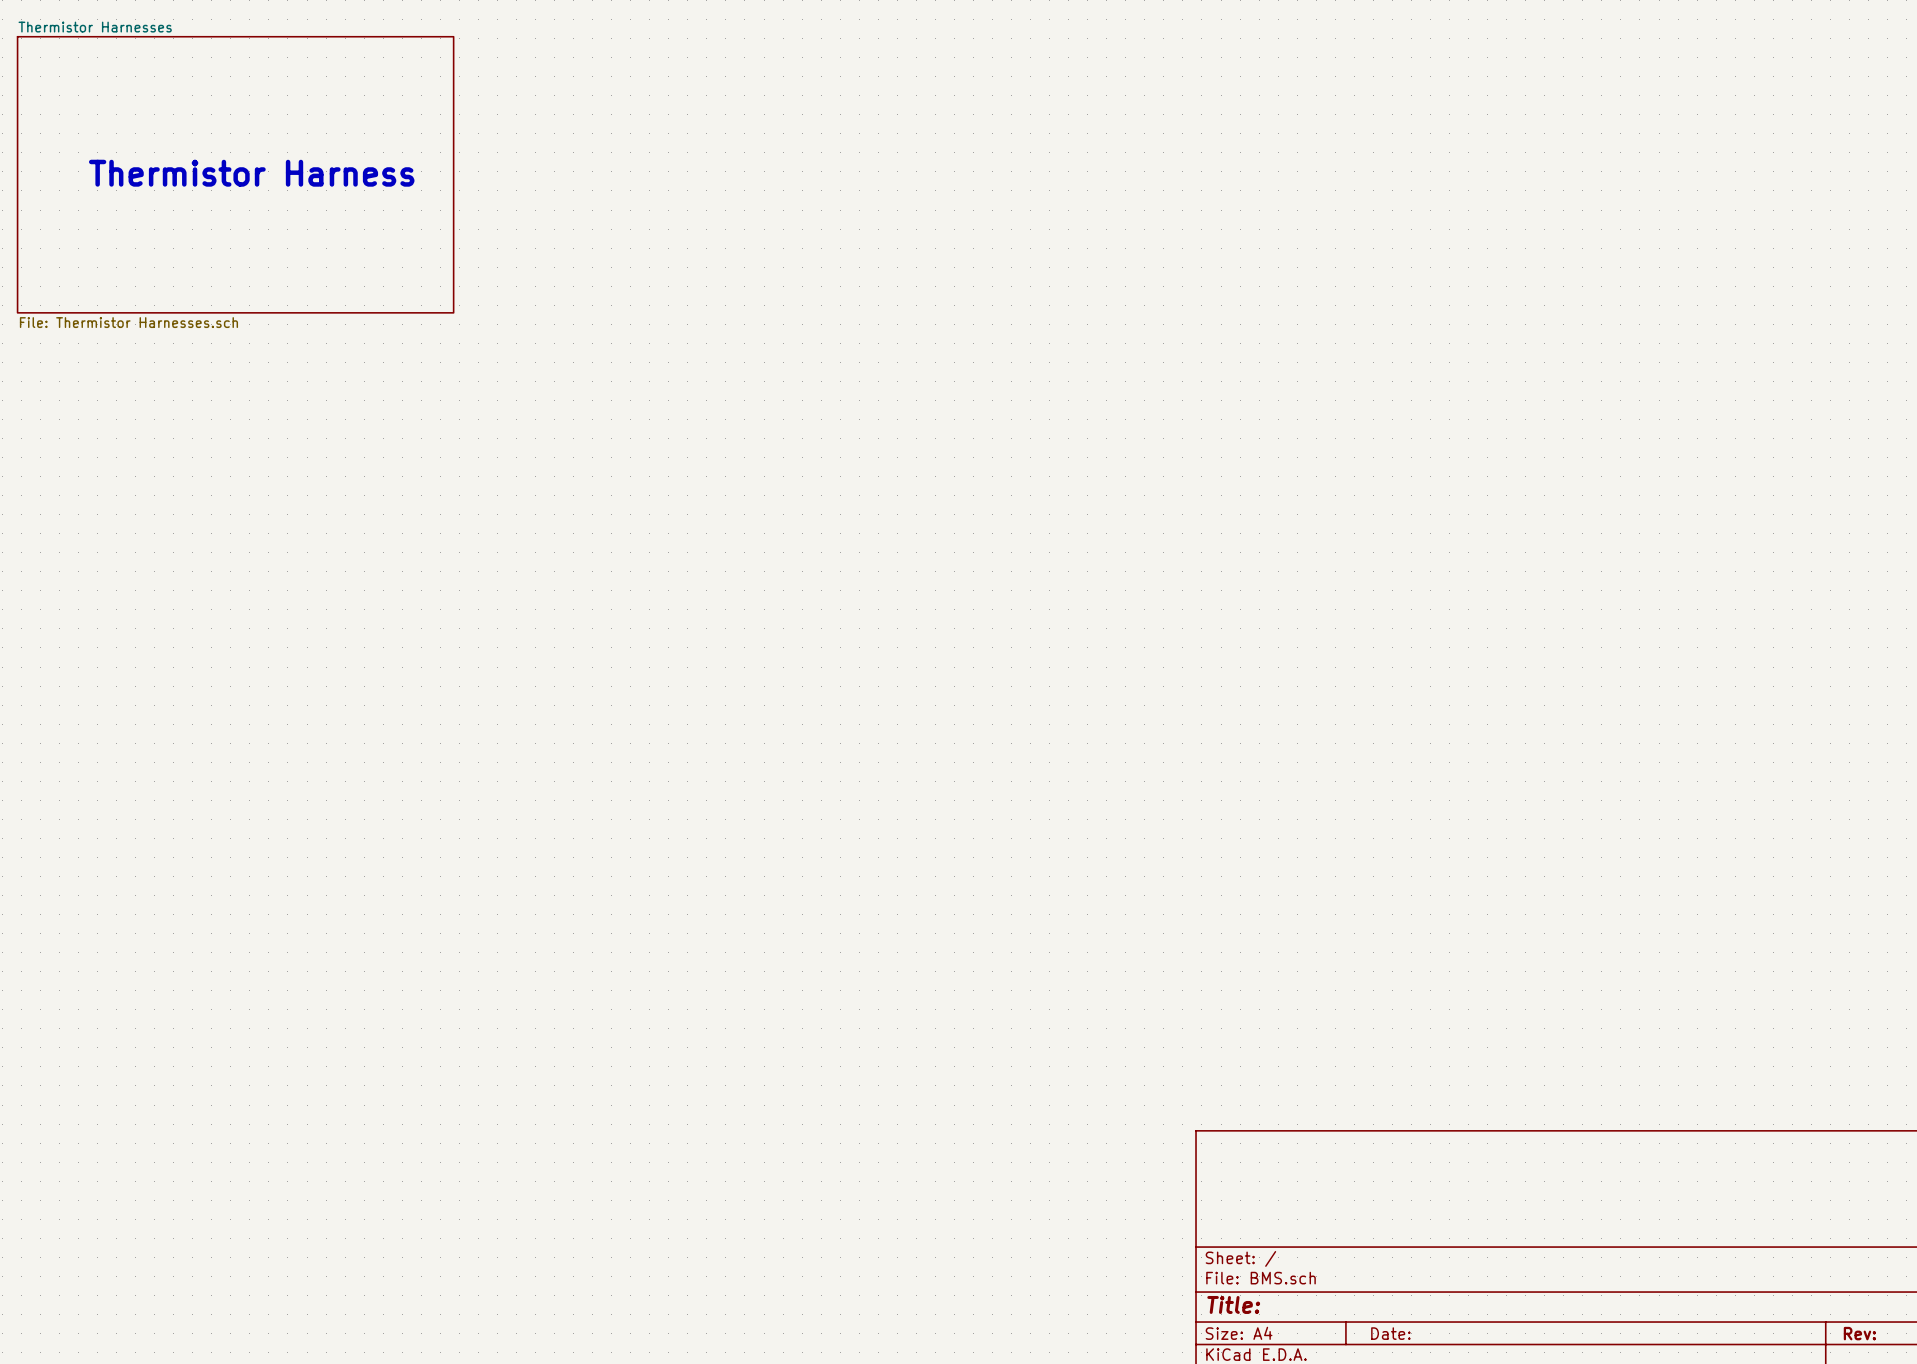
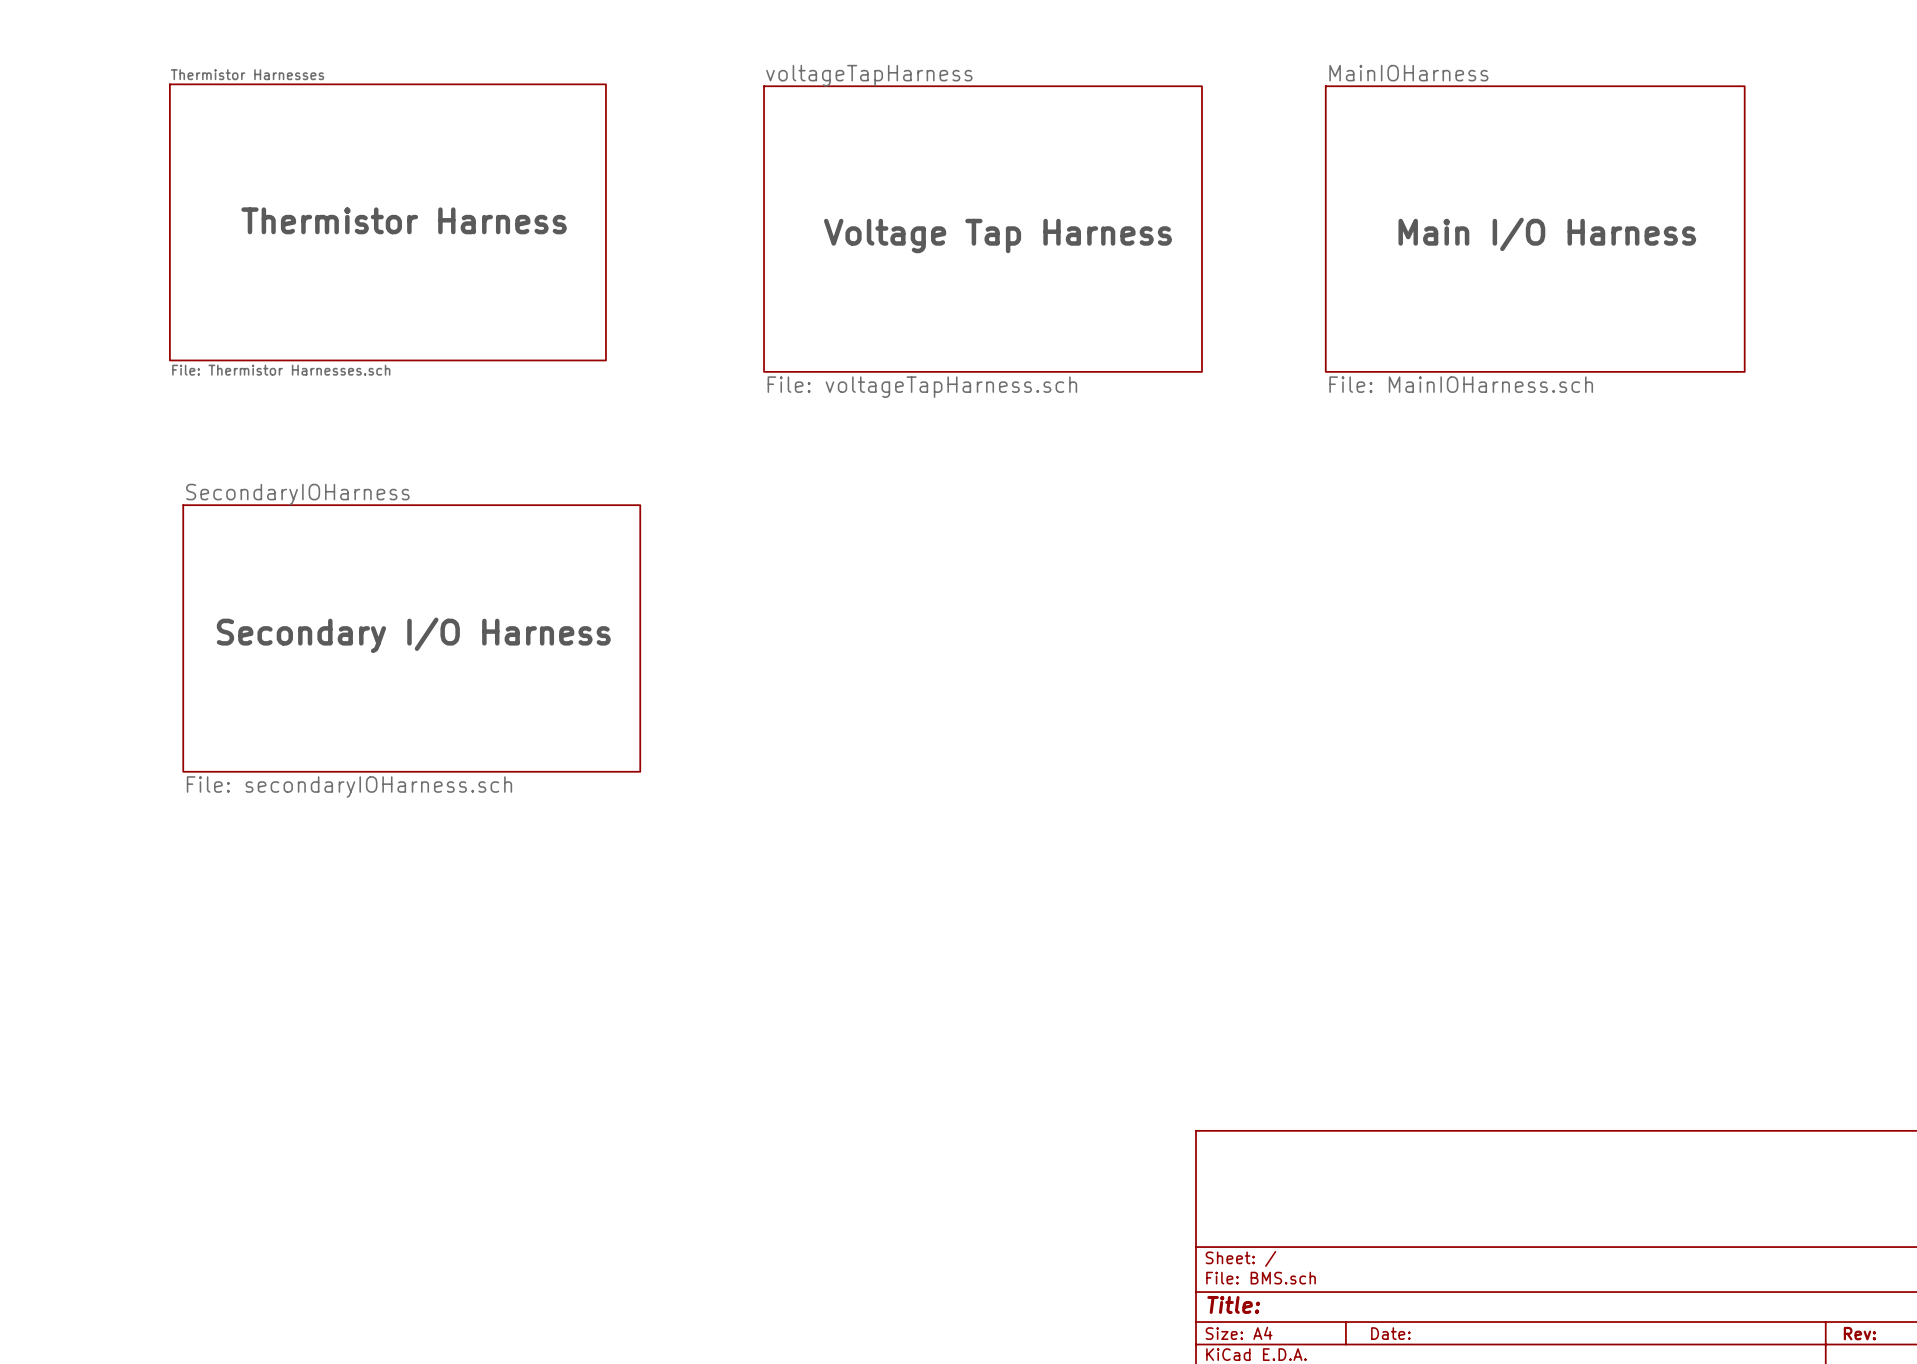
text position: Thermistor Harness (251, 173) -> Thermistor Harness (404, 220)
sheet Thermistor Harnesses position: (235, 174) -> (387, 222)
sheet voltageTapHarness: none -> File: voltageTapHarness.sch (983, 229)
sheet MainIOHarness: none -> File: MainIOHarness.sch (1535, 229)
text: none -> Main I/O Harness (1547, 234)
text: none -> Voltage Tap Harness (997, 235)
text: none -> Secondary I/O Harness (413, 635)
sheet SecondaryIOHarness: none -> File: secondaryIOHarness.sch (411, 638)

